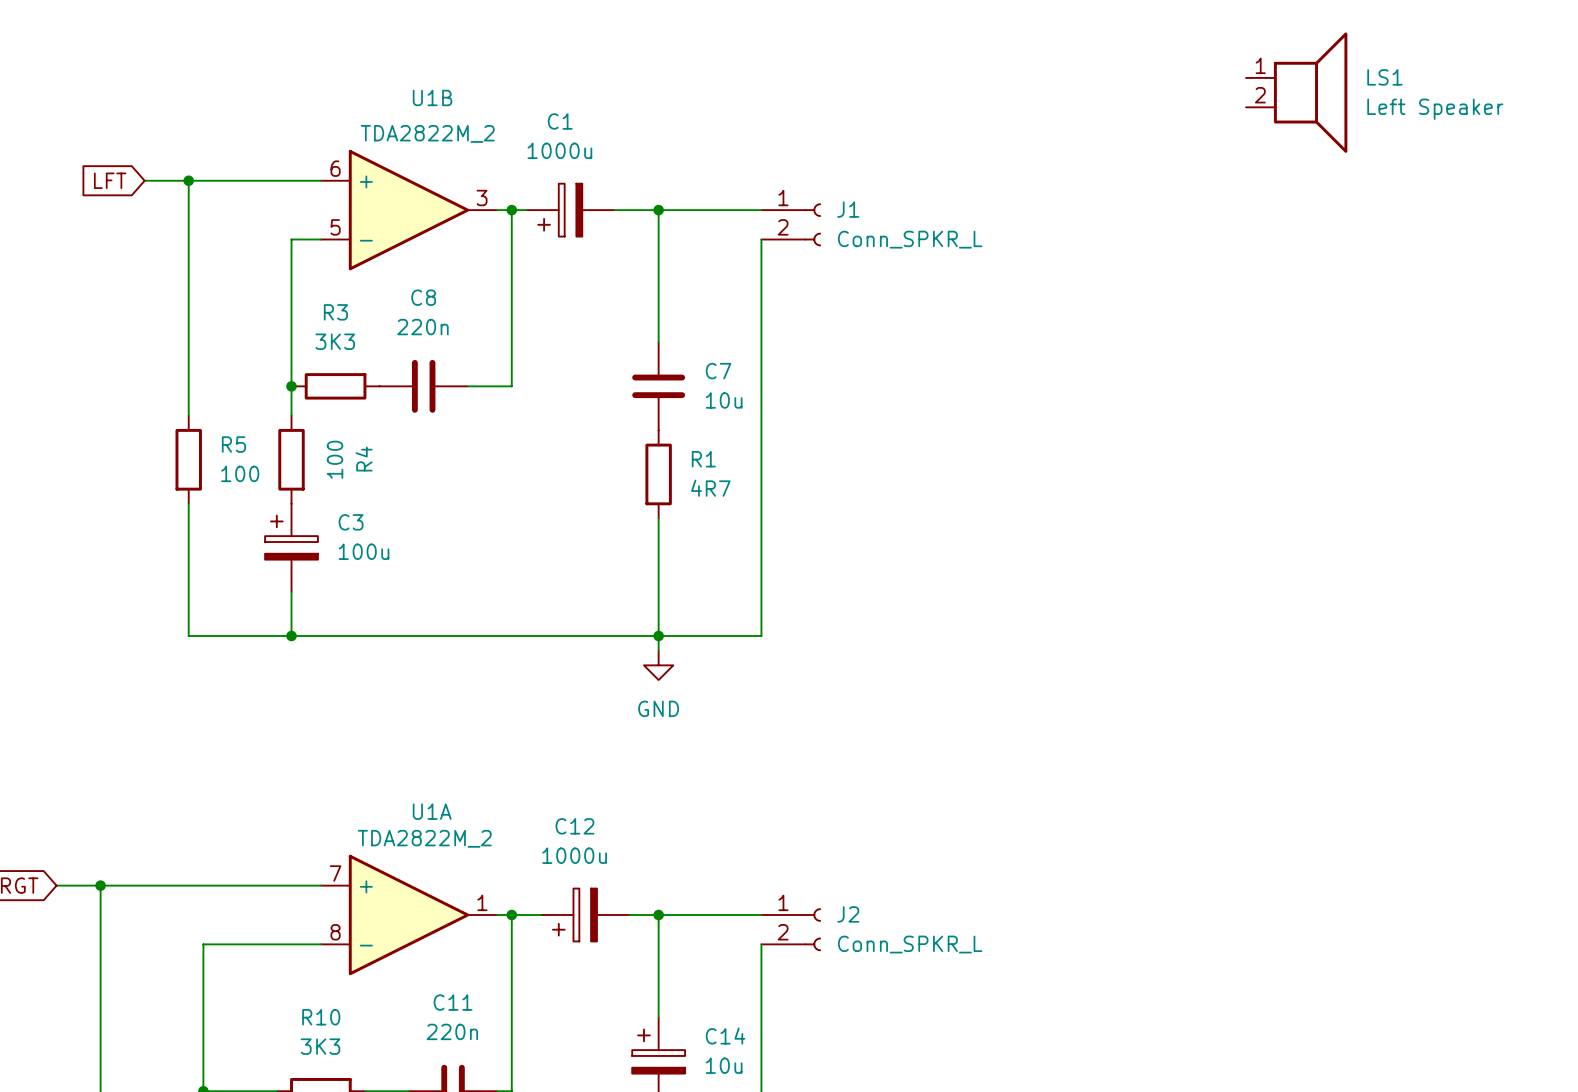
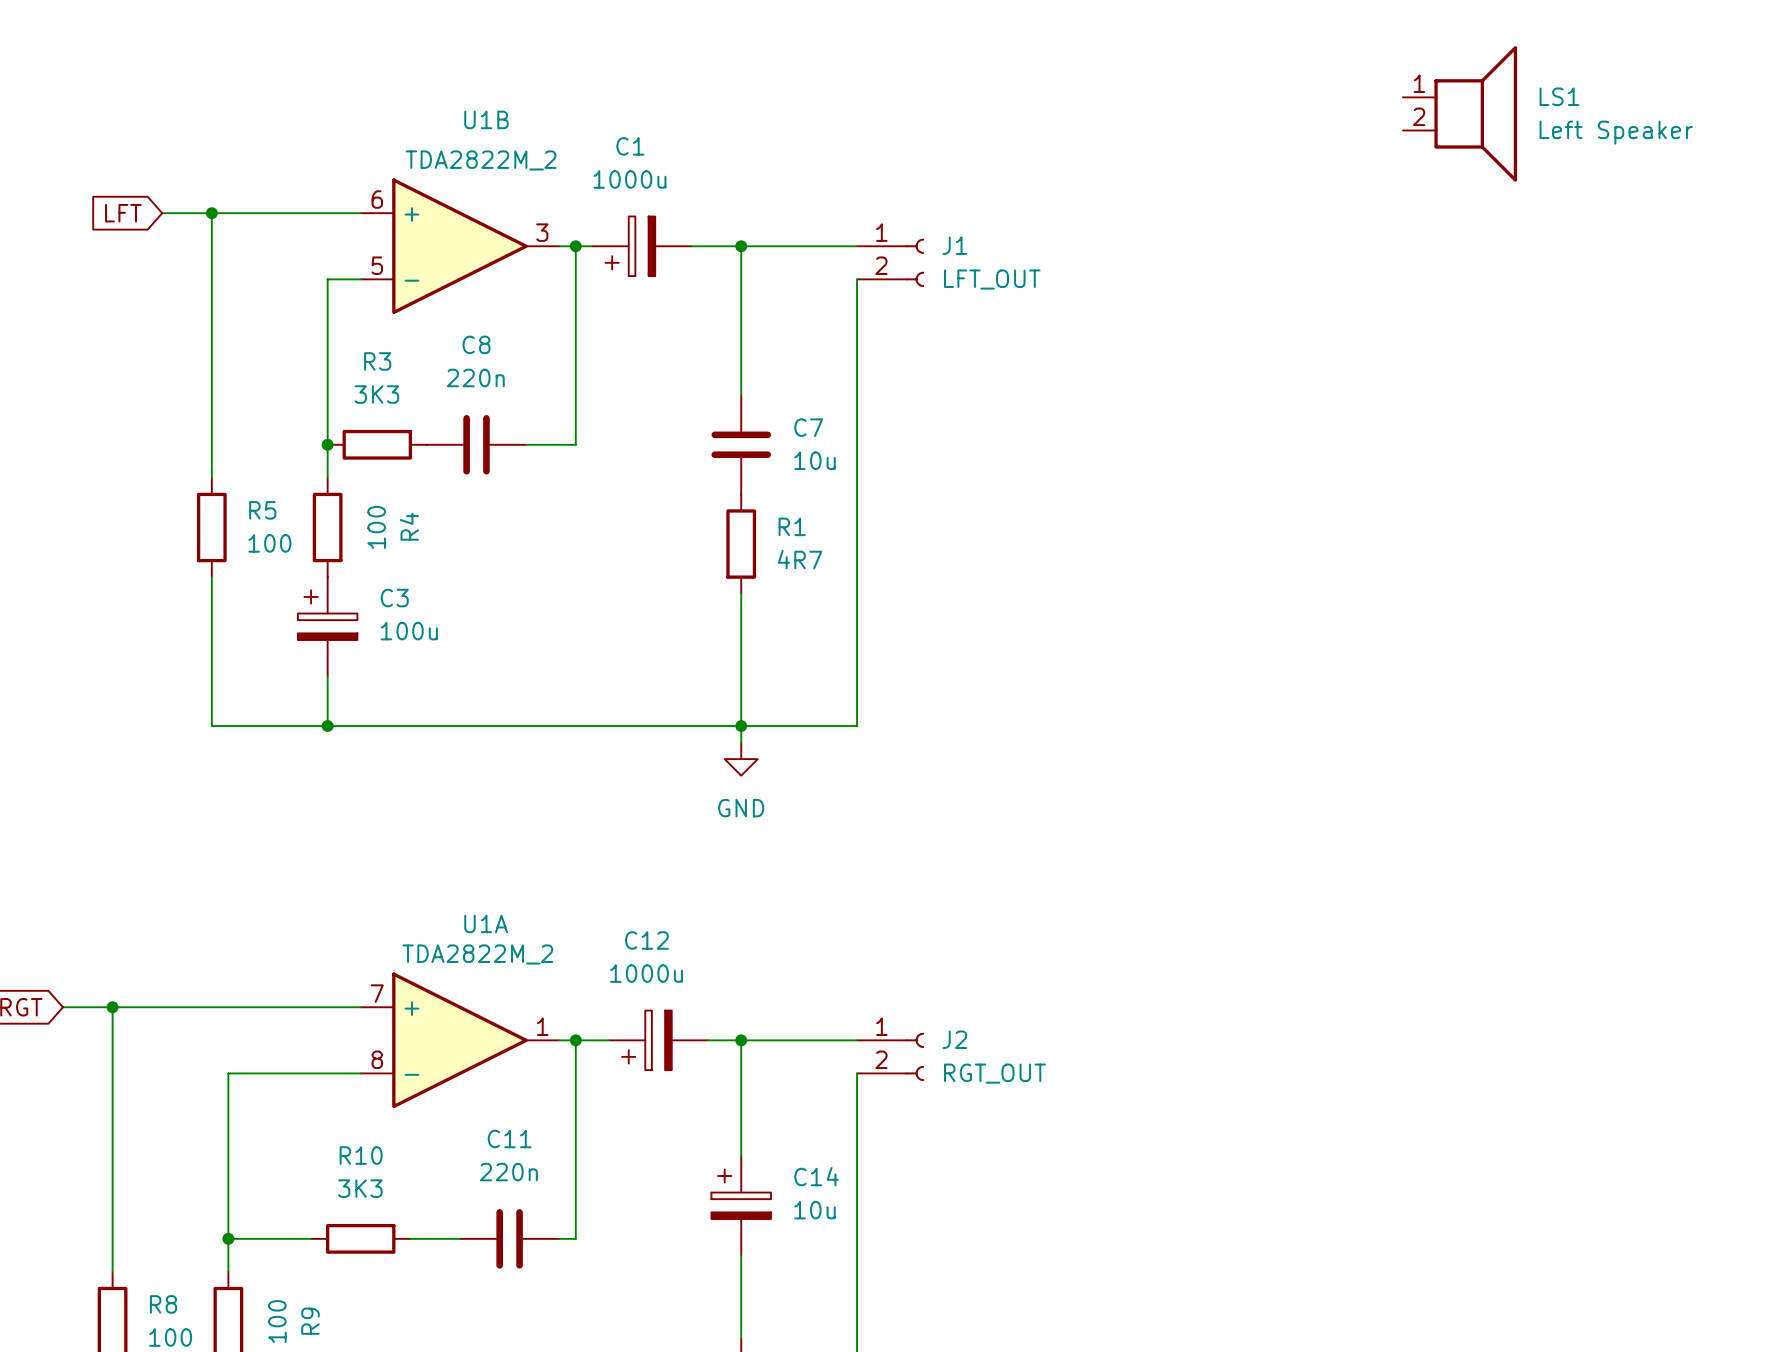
J1 value: Conn_SPKR_L (910, 239) -> LFT_OUT (992, 279)
J2 value: Conn_SPKR_L (910, 944) -> RGT_OUT (995, 1073)

